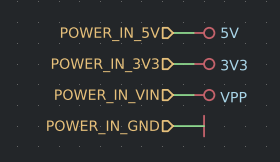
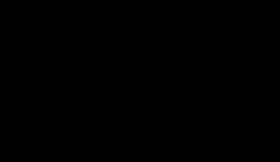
wire: (173, 32) (193, 32) -> none
power symbol: 5V (204, 32) -> none
hierarchical label: POWER_IN_5V (110, 34) -> none
wire: (173, 64) (193, 64) -> none
power symbol: 3V3 (204, 64) -> none
hierarchical label: POWER_IN_3V3 (105, 65) -> none
wire: (173, 95) (193, 95) -> none
power symbol: VPP (204, 95) -> none
hierarchical label: POWER_IN_VIN (106, 96) -> none
wire: (173, 126) (204, 126) -> none
power symbol: (204, 126) -> none
hierarchical label: POWER_IN_GND (103, 127) -> none

